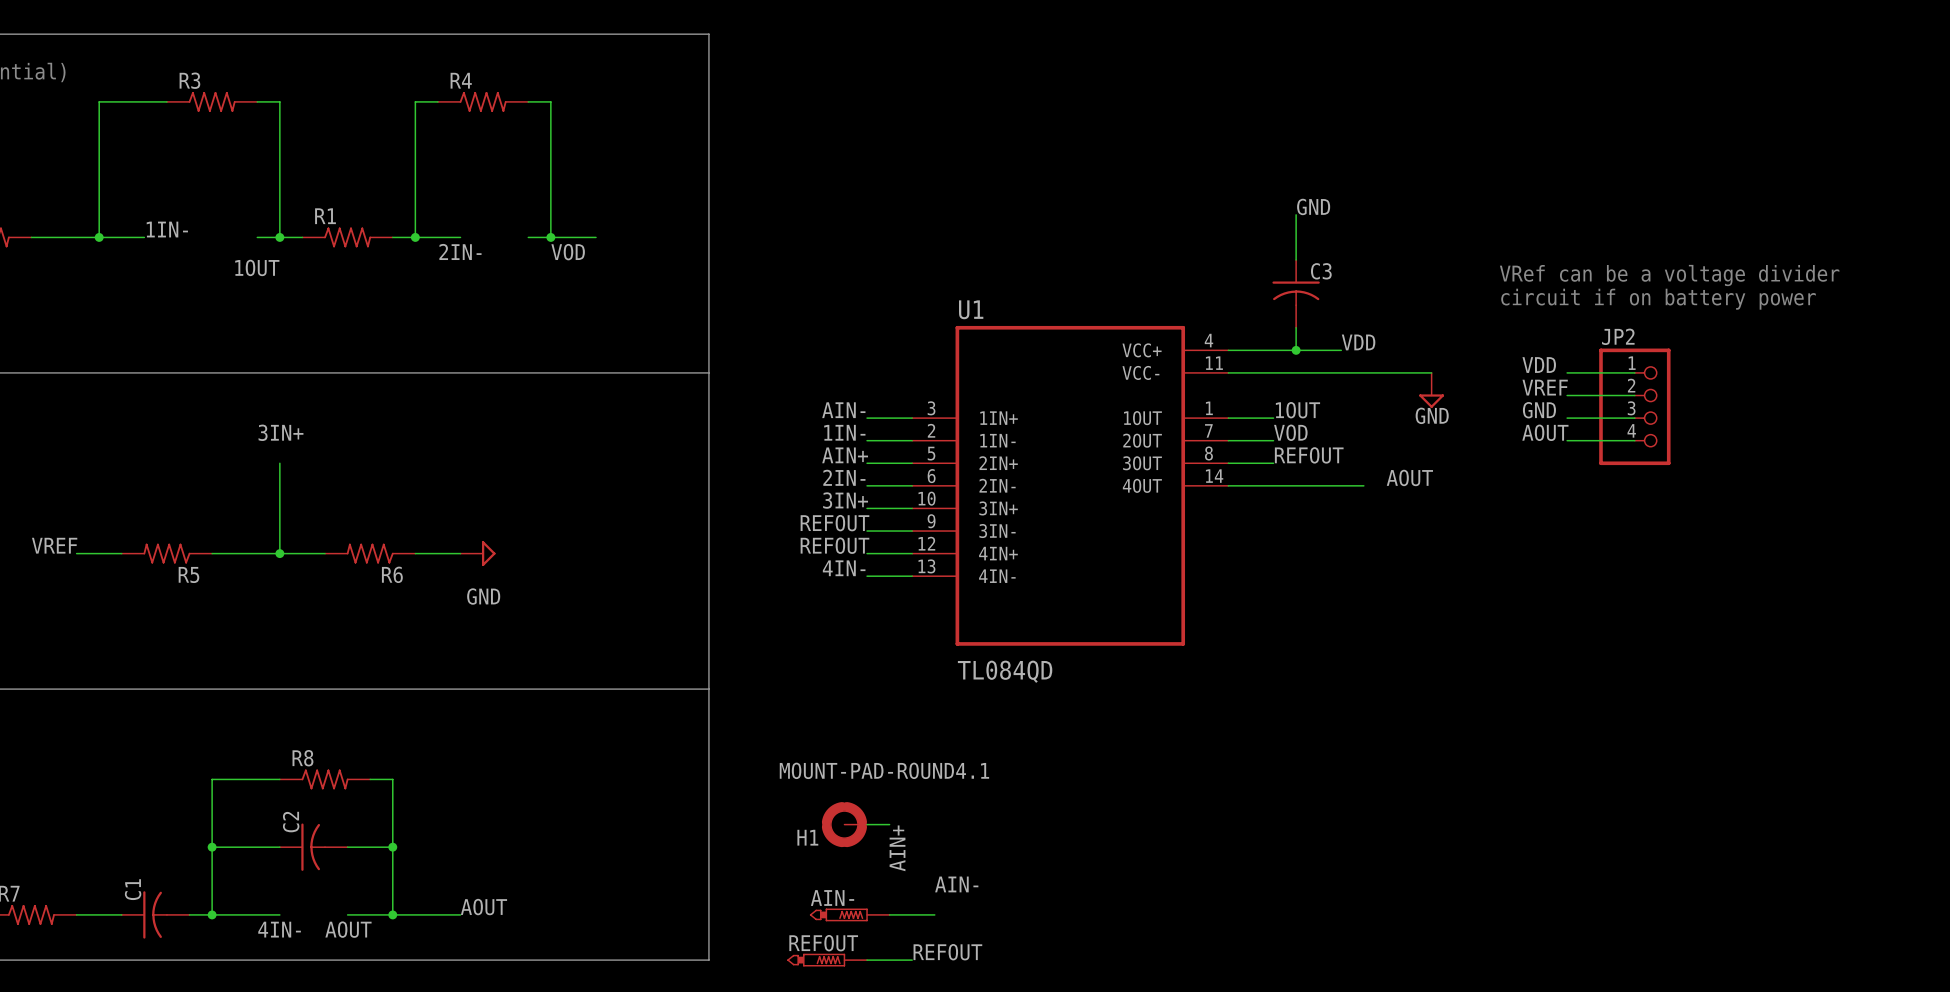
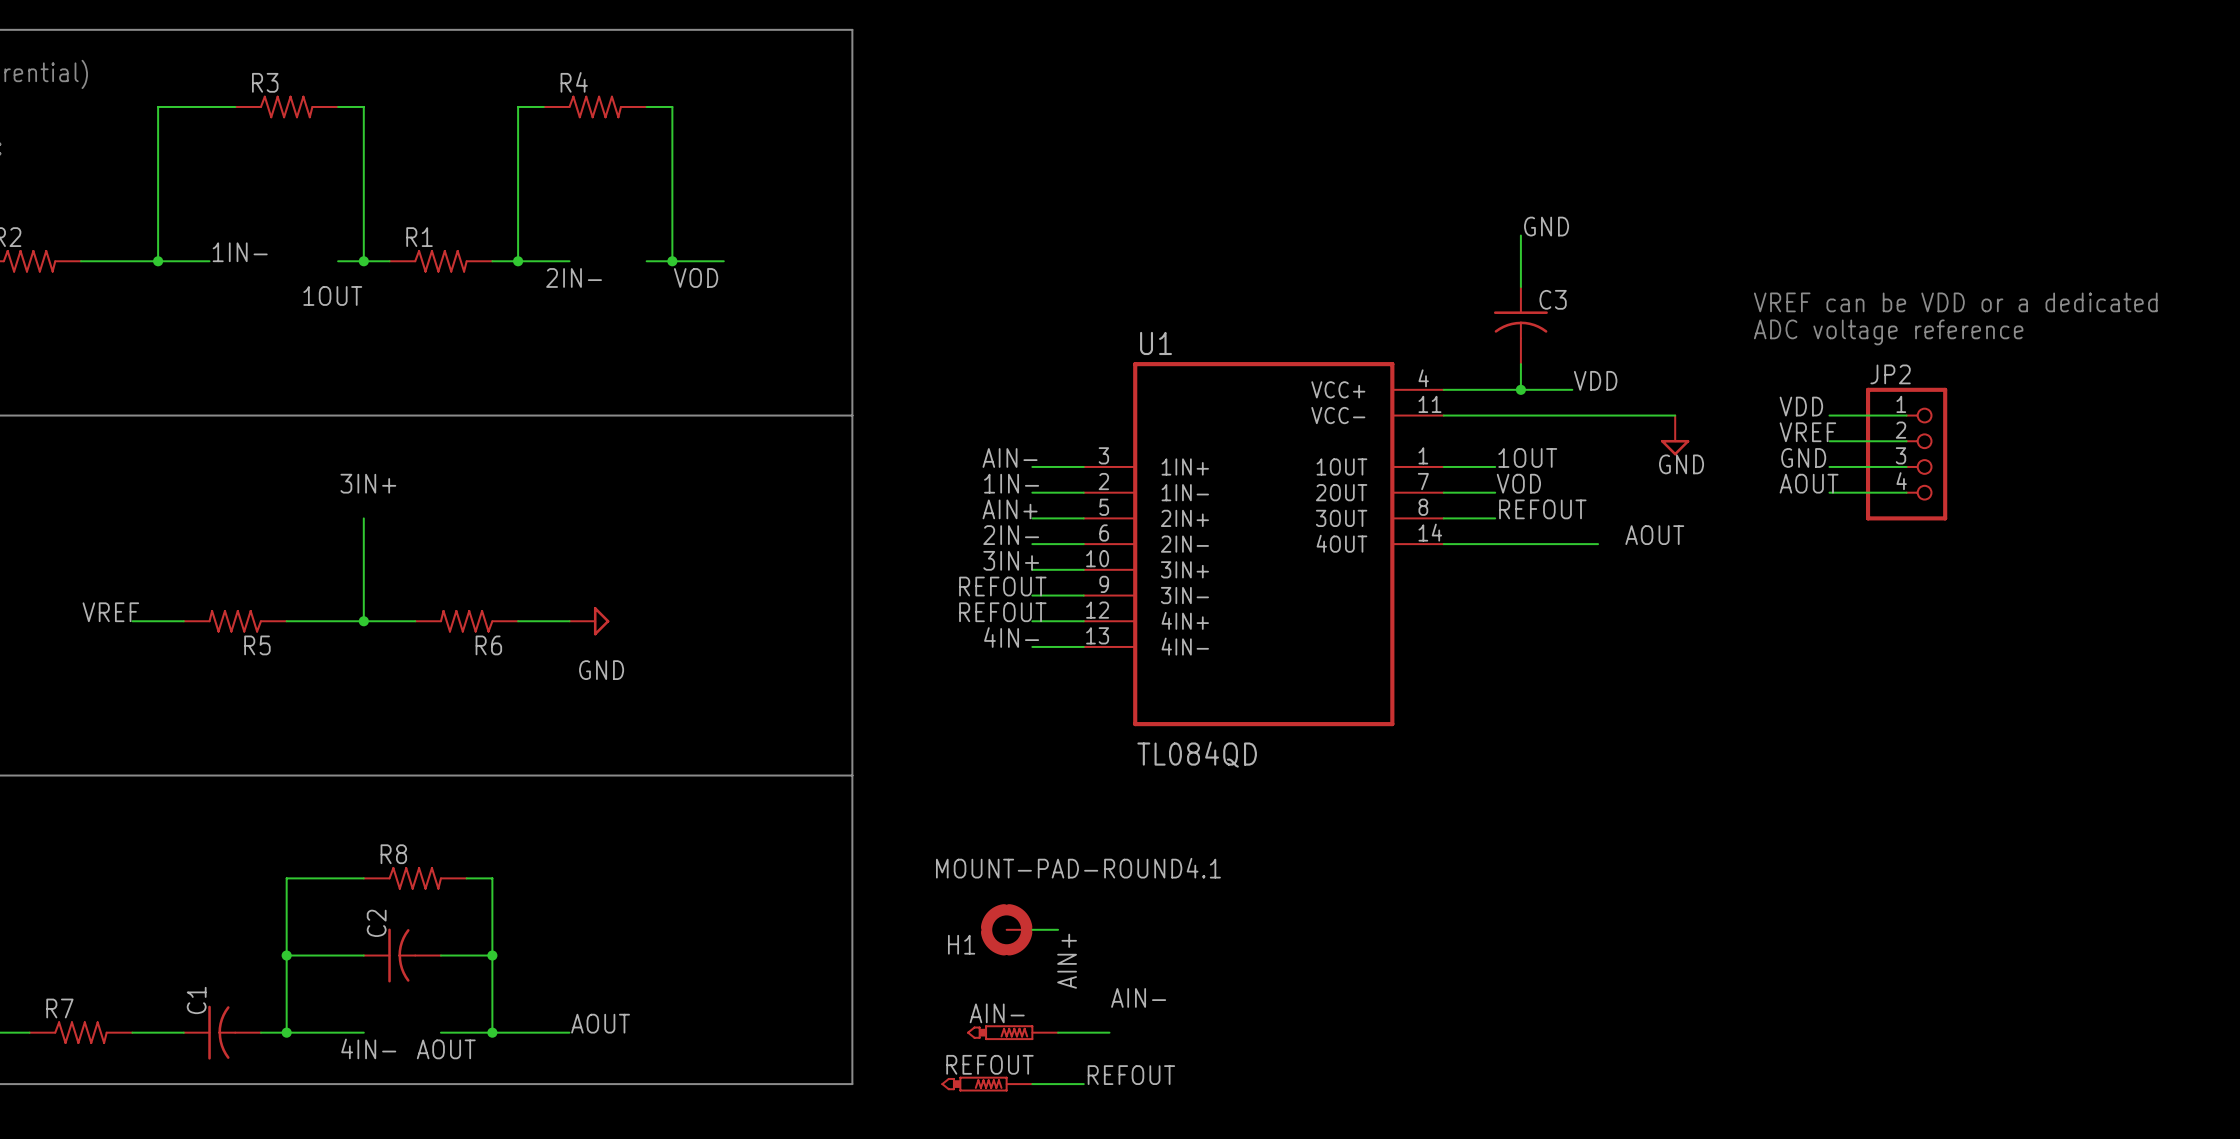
text: VRef can be a voltage divider (1669, 275) -> VREF can be VDD or a dedicated (1955, 302)
text: circuit if on battery power (1658, 299) -> ADC voltage reference (1888, 332)

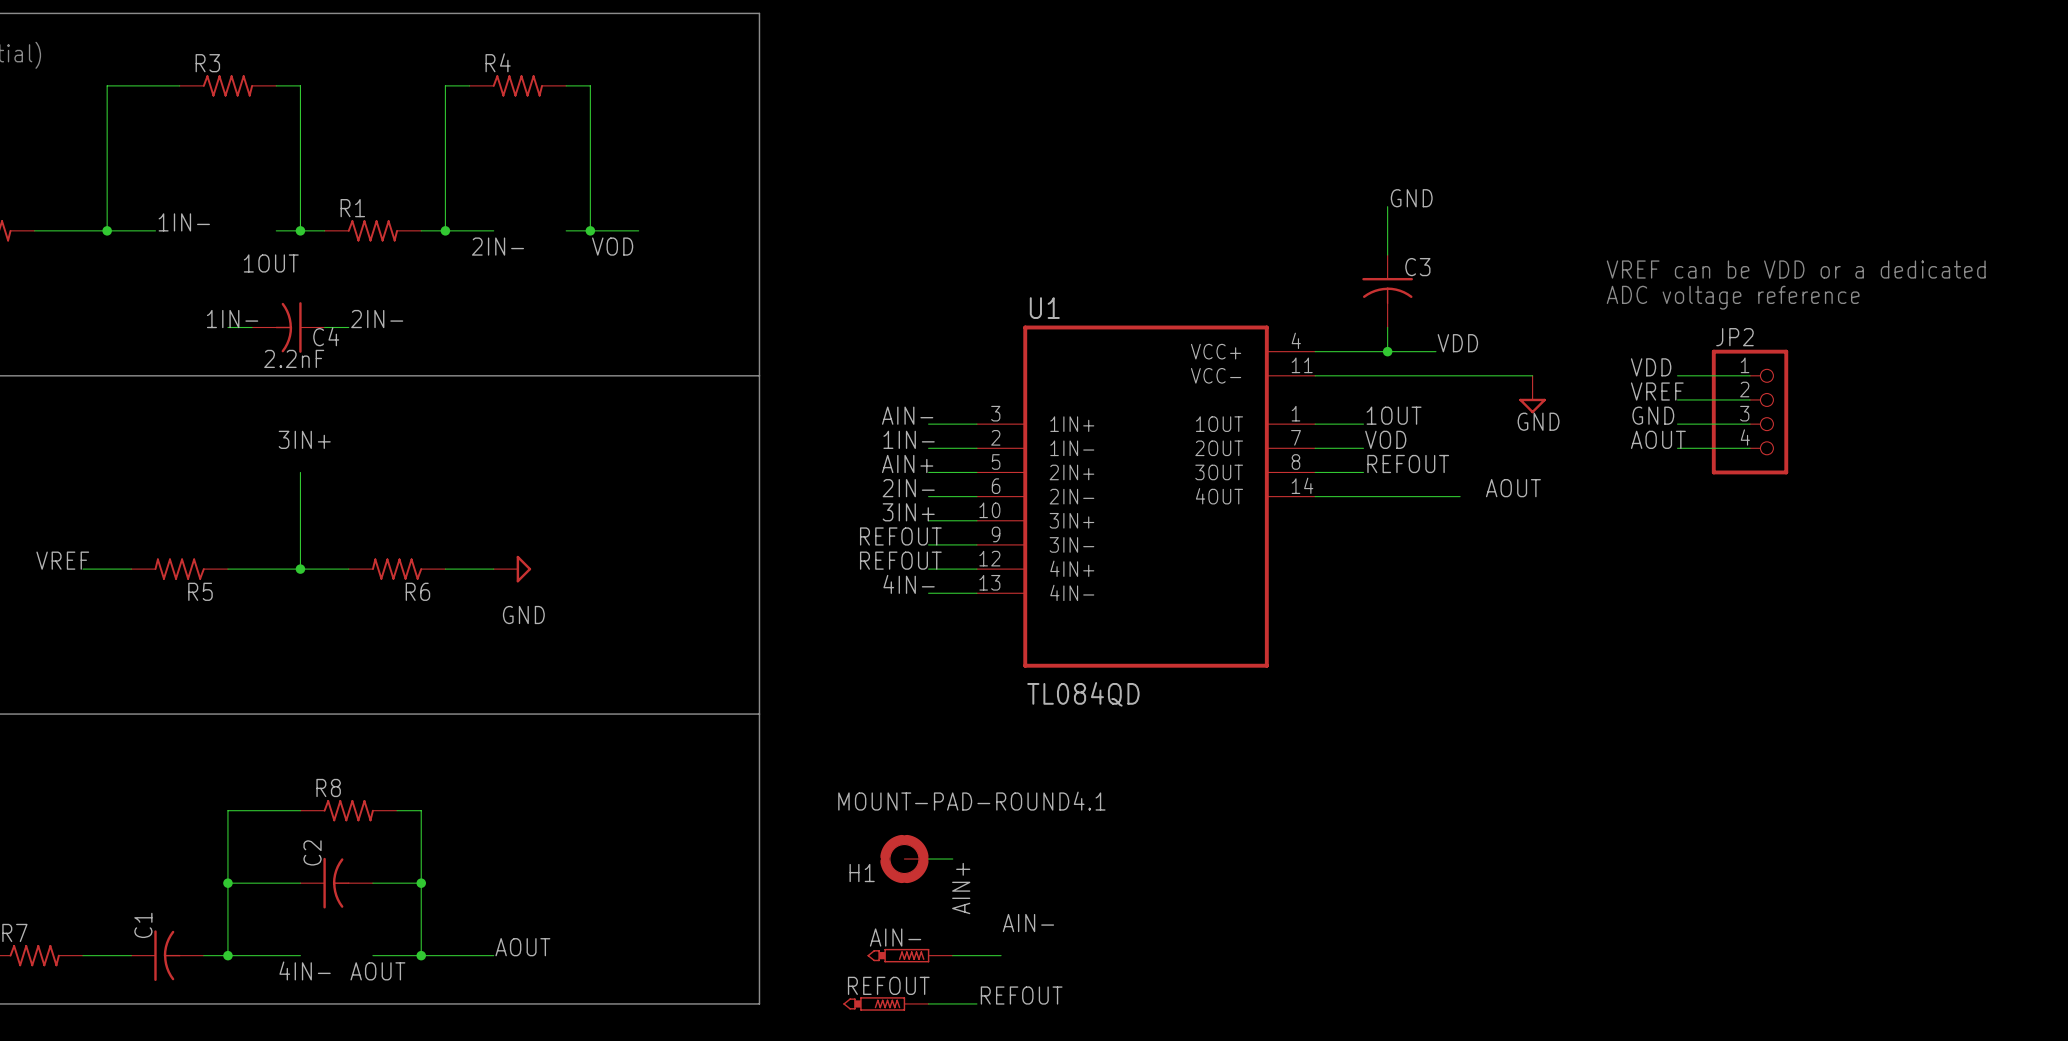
label: none -> 1IN- (232, 319)
label: none -> 2IN- (377, 319)
wire: none -> (227, 327) (252, 327)
C4: none -> 2.2nF (288, 327)
wire: none -> (324, 327) (348, 327)

